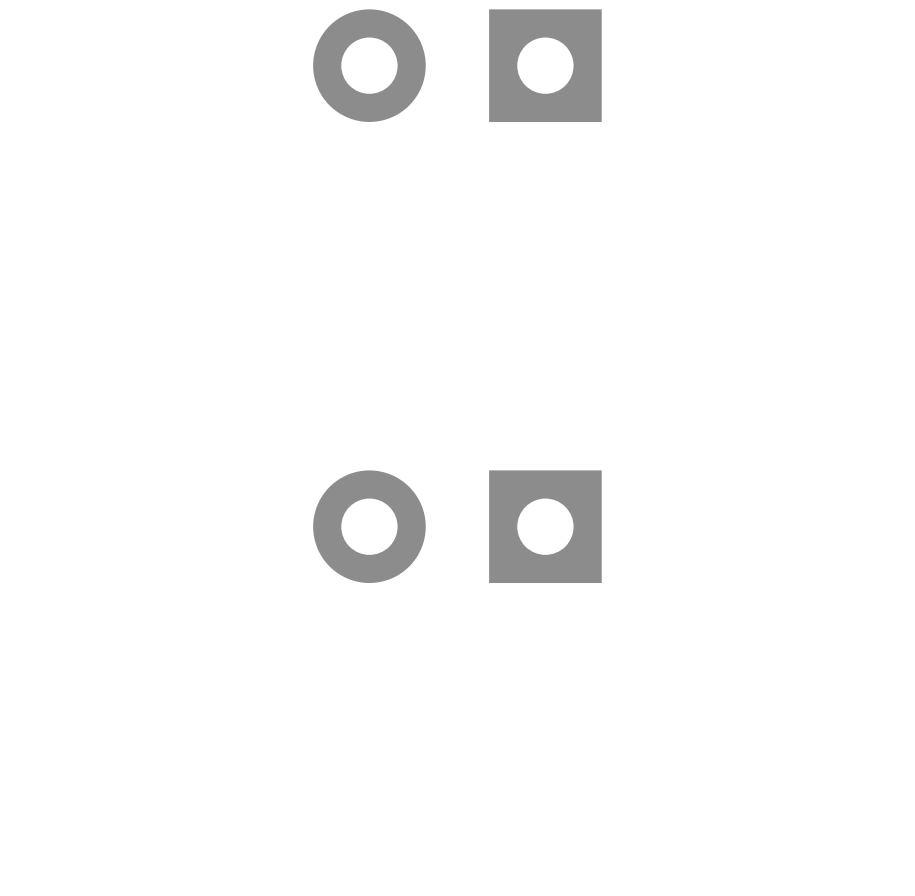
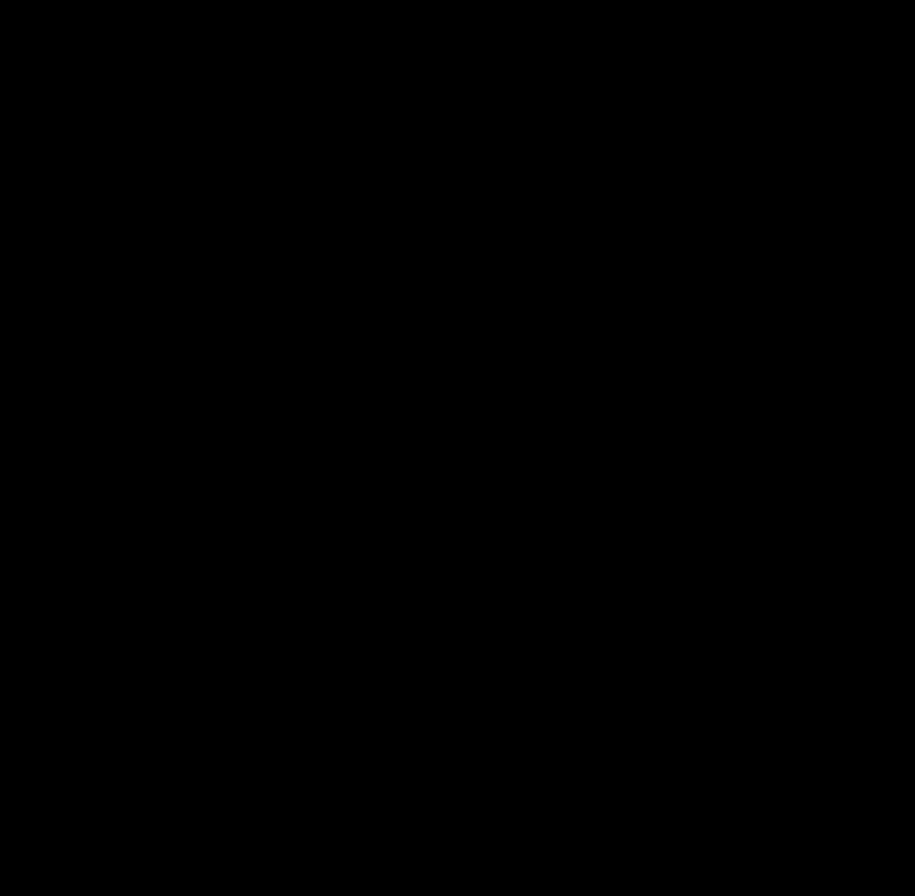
part: (457, 65) -> none
part: (457, 526) -> none

